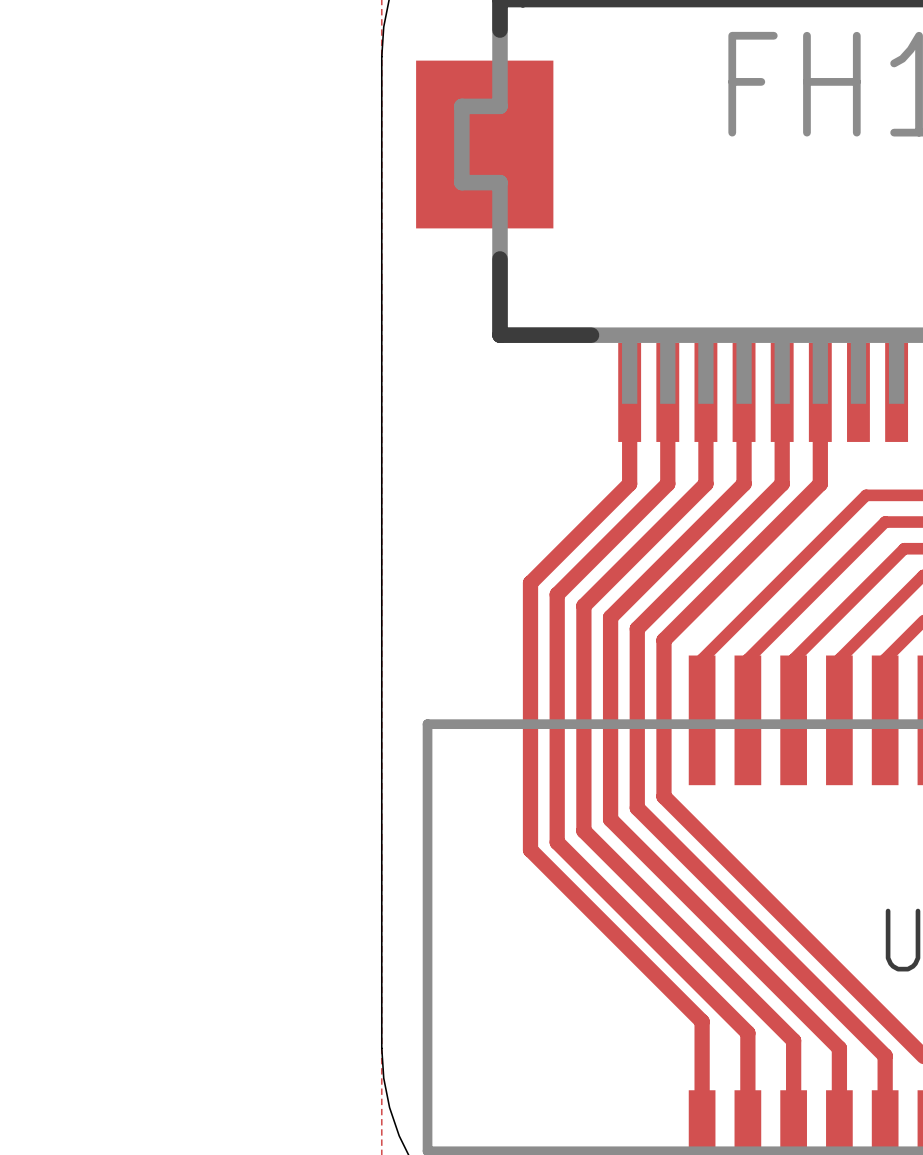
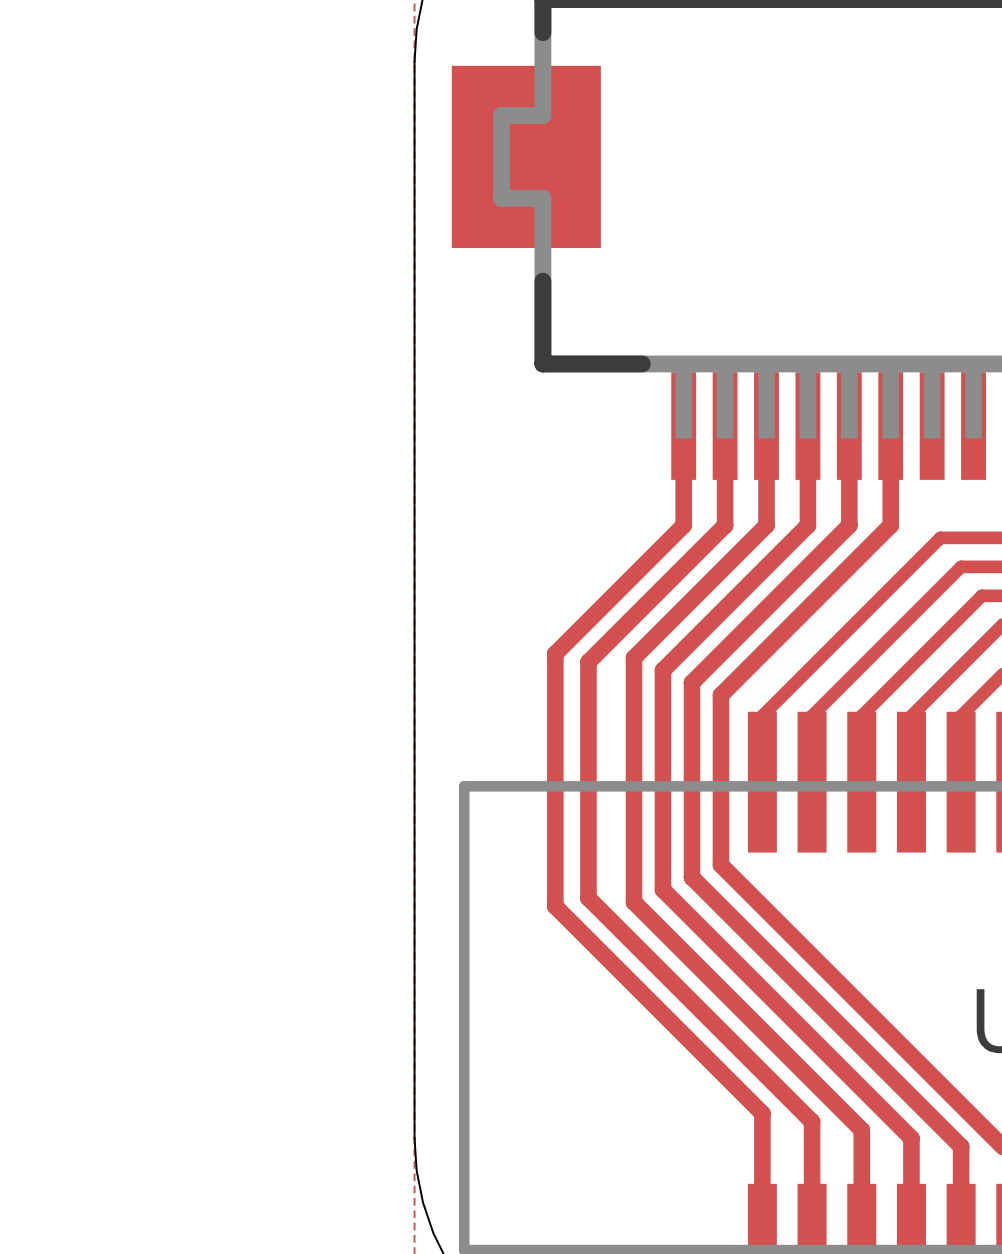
track: (530, 583) (530, 850) (702, 1021) (702, 1025) -> (576, 633) (555, 653) (555, 906) (762, 1113)
track: (557, 594) (557, 842) -> (605, 645) (588, 662) (588, 898) (605, 914)

